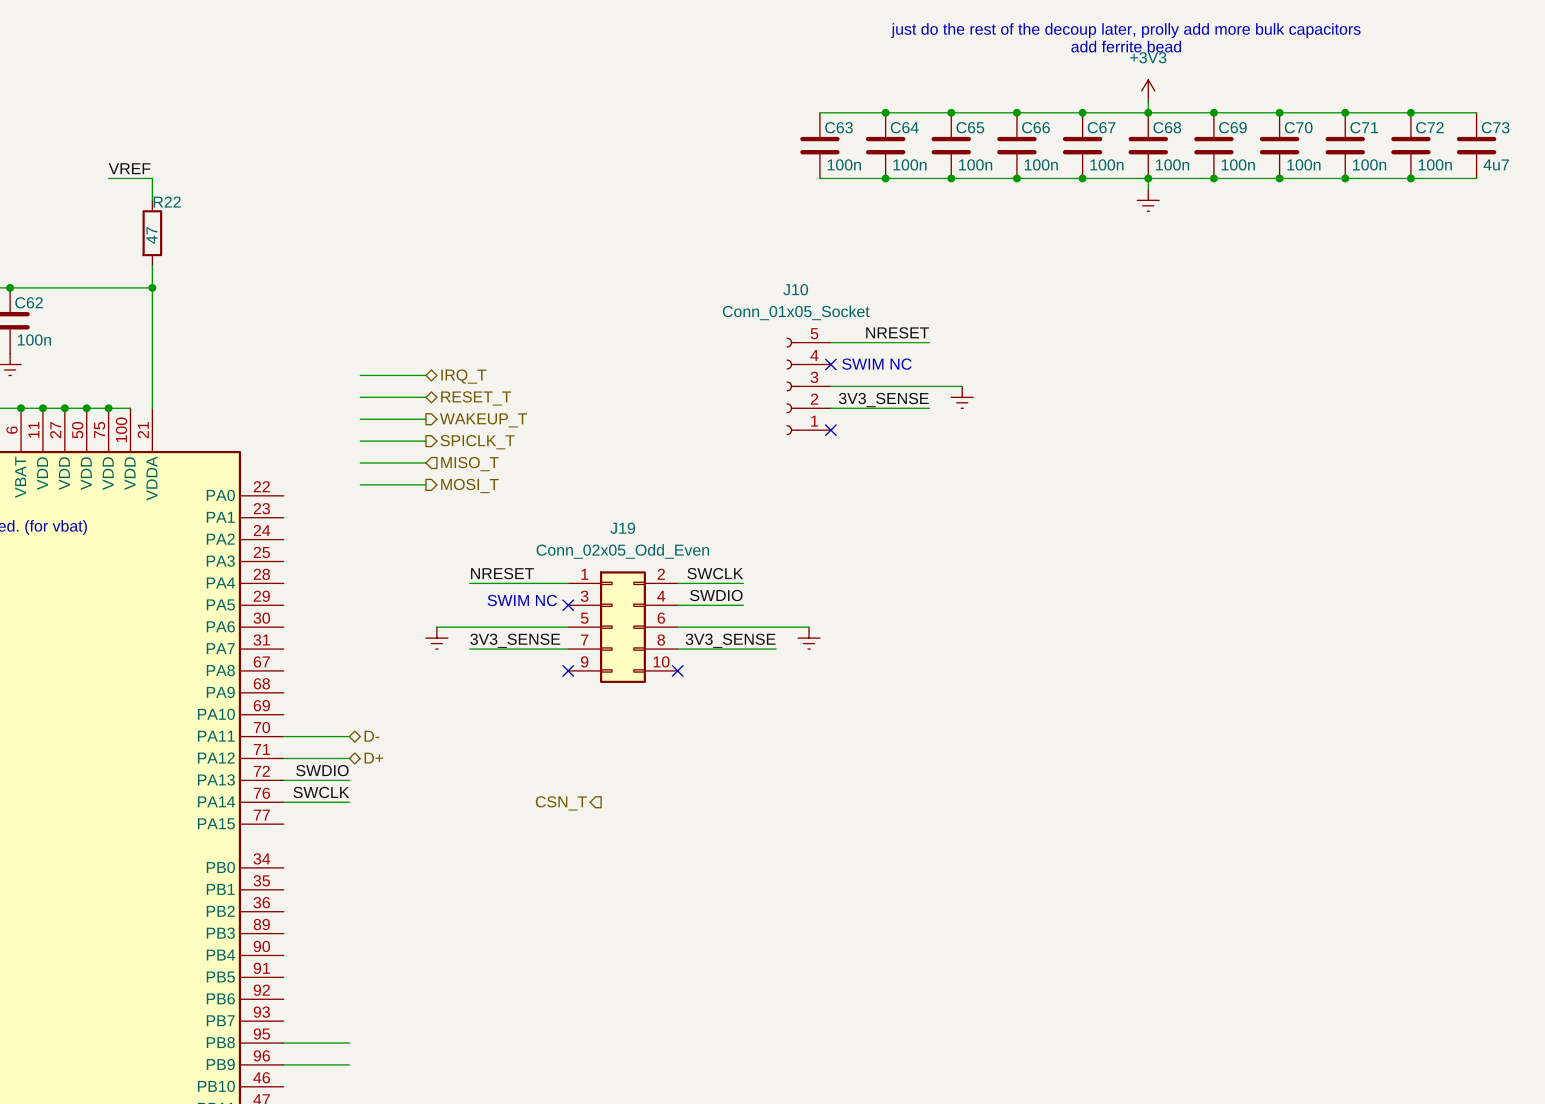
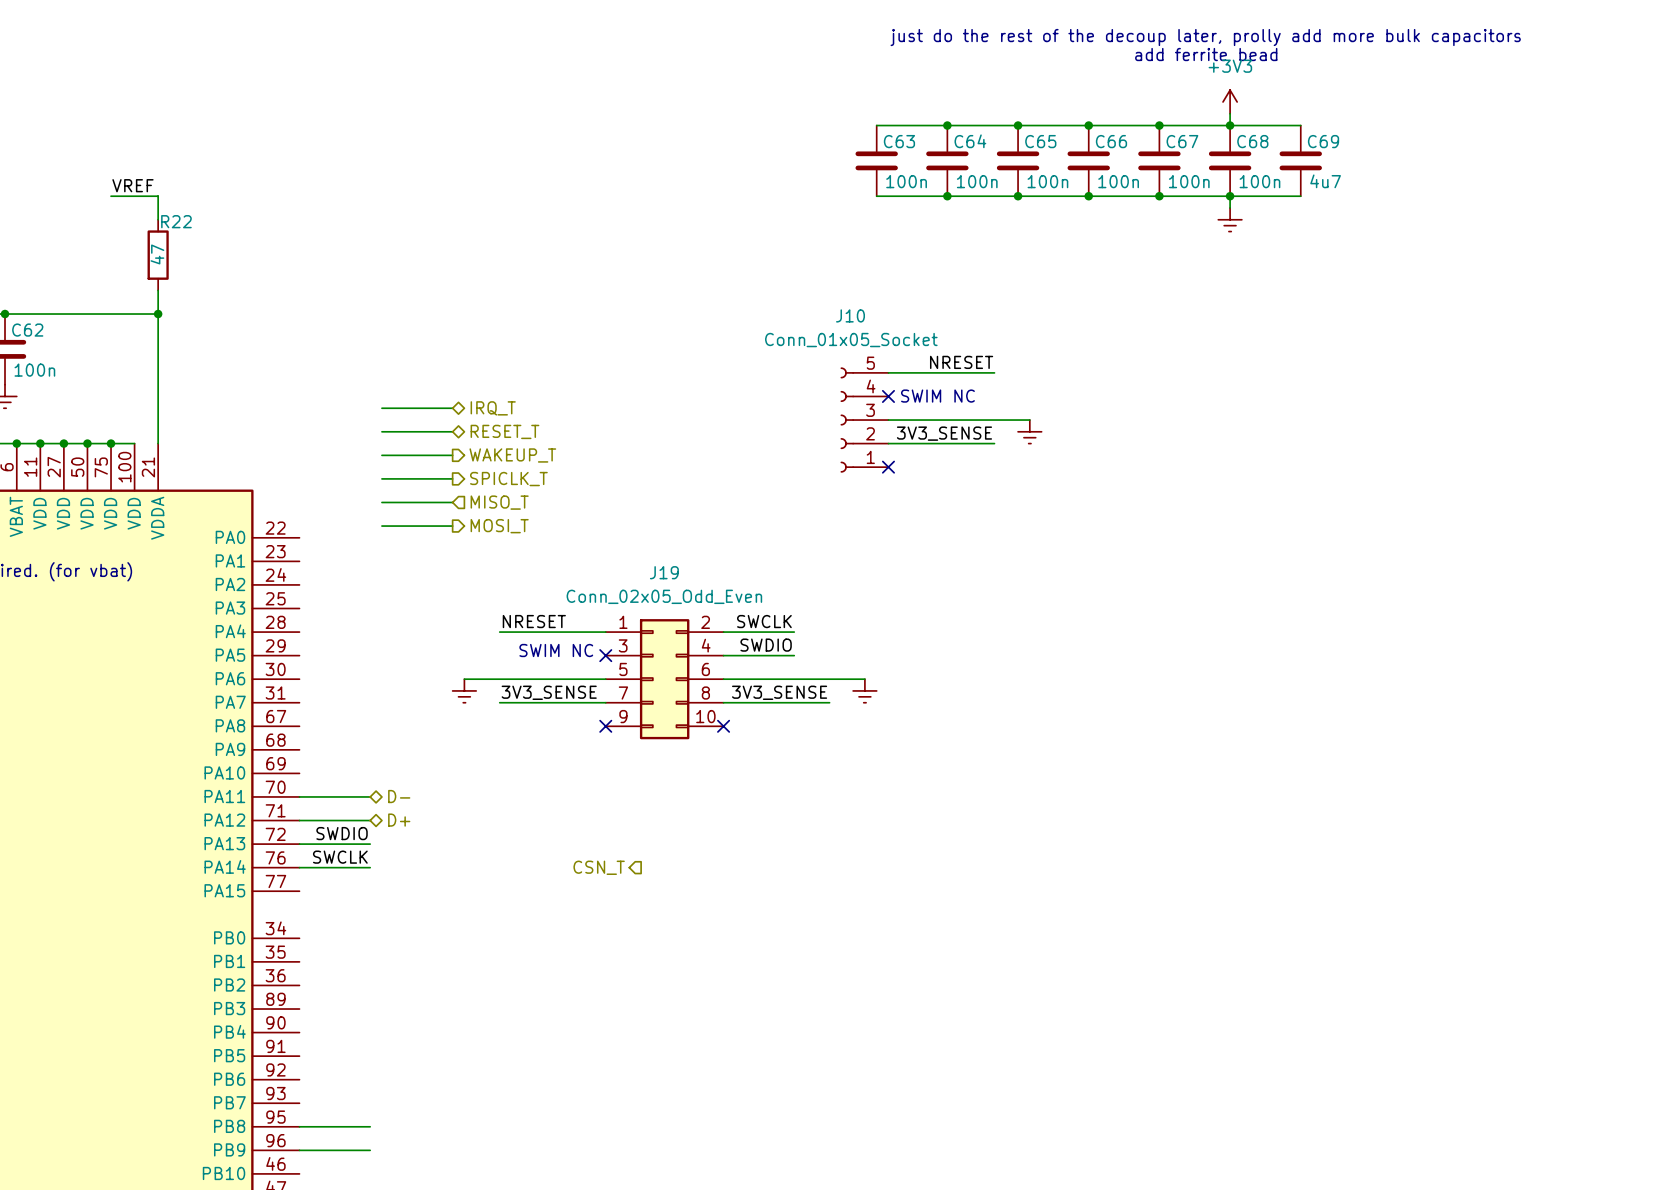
wire: (1213, 112) (1476, 112) -> none
junction: (1213, 112) -> none
junction: (1279, 112) -> none
junction: (1345, 112) -> none
junction: (1410, 112) -> none
C70: 100n (1279, 145) -> none
C71: 100n (1345, 145) -> none
C72: 100n (1410, 145) -> none
C73: 4u7 (1476, 145) -> none
C69 value: 100n (1238, 164) -> 4u7 (1325, 181)
wire: (1213, 178) (1476, 178) -> none
junction: (1213, 178) -> none
junction: (1279, 178) -> none
junction: (1345, 178) -> none
junction: (1410, 178) -> none

